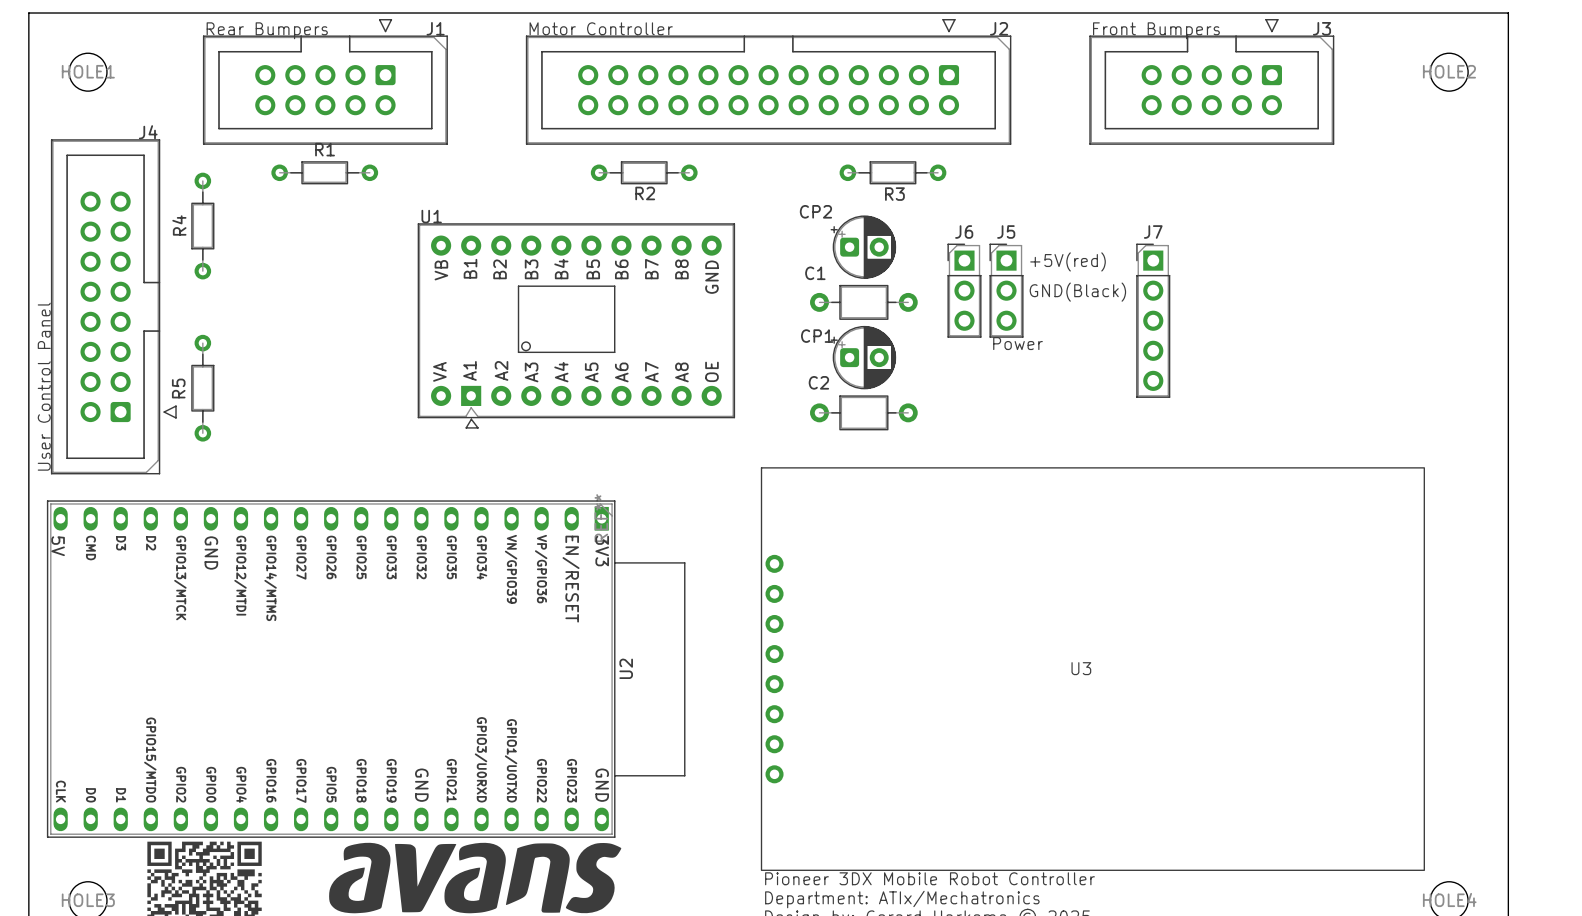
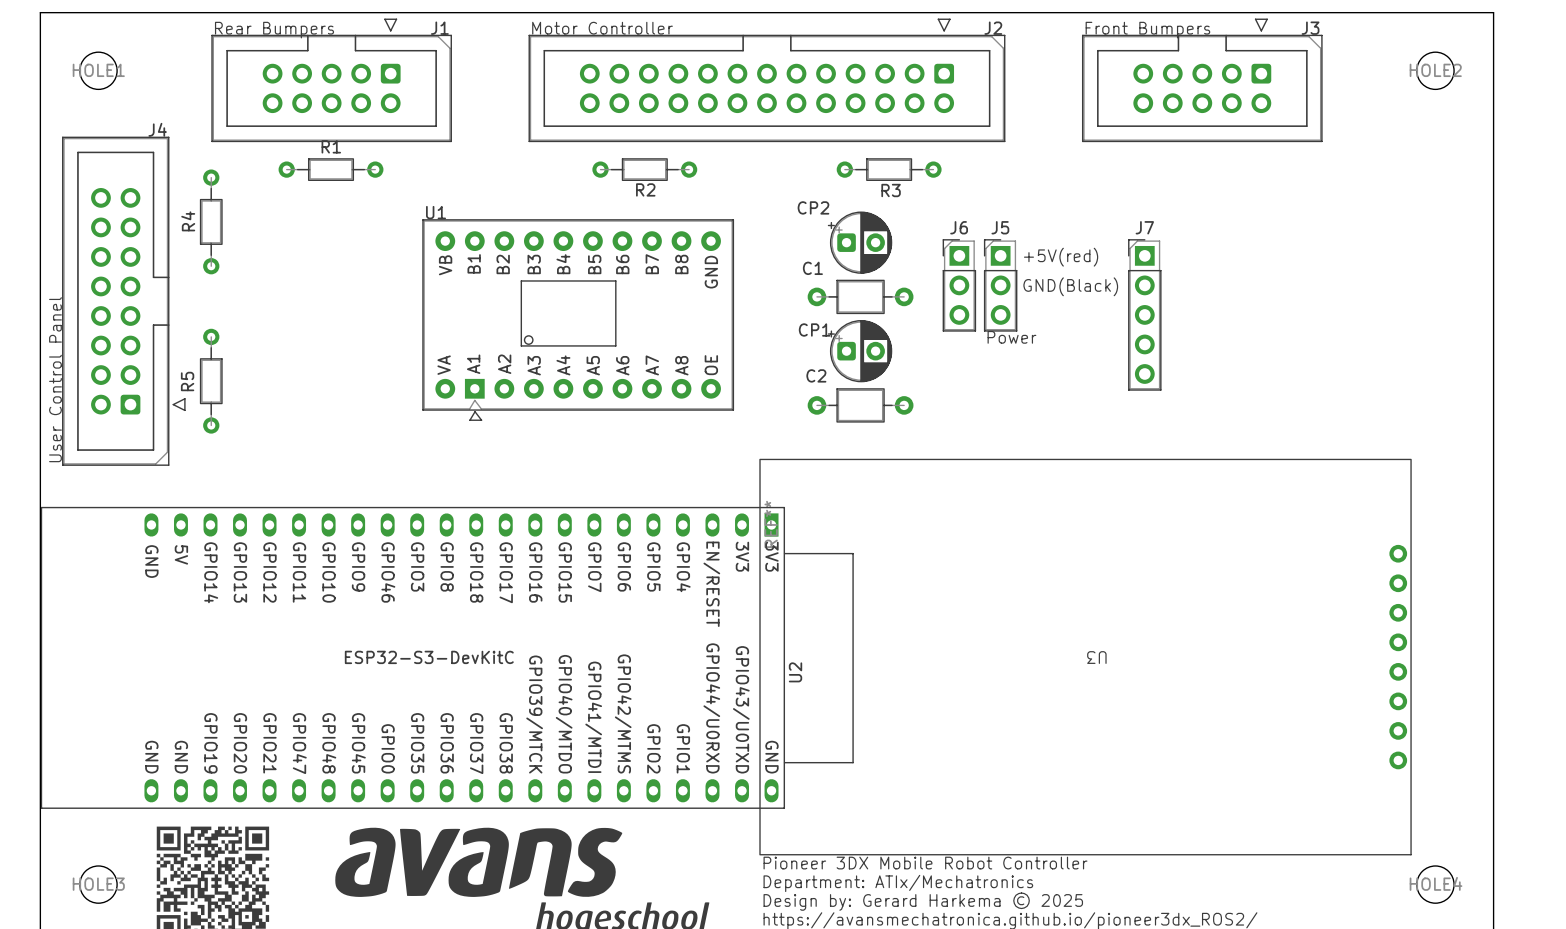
U2 footprint: [46, 500, 686, 838] -> [40, 506, 854, 809]
U2 name position: U2 (626, 668) -> U2 (795, 672)
U2 value: none -> ESP32-S3-DevKitC (429, 657)
U3 rotation: 0° (1092, 669) -> 180° (1085, 657)

